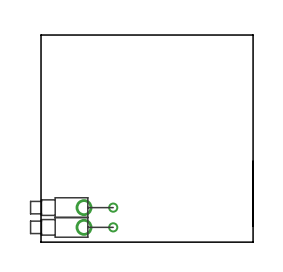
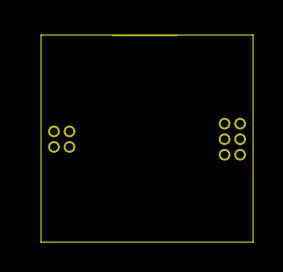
part: none -> (61, 139)
part: none -> (232, 139)
part rotation: 0° (252, 193) -> 90° clockwise (144, 35)
part position: (252, 193) -> (144, 35)
part: (74, 207) -> none
part: (74, 227) -> none

